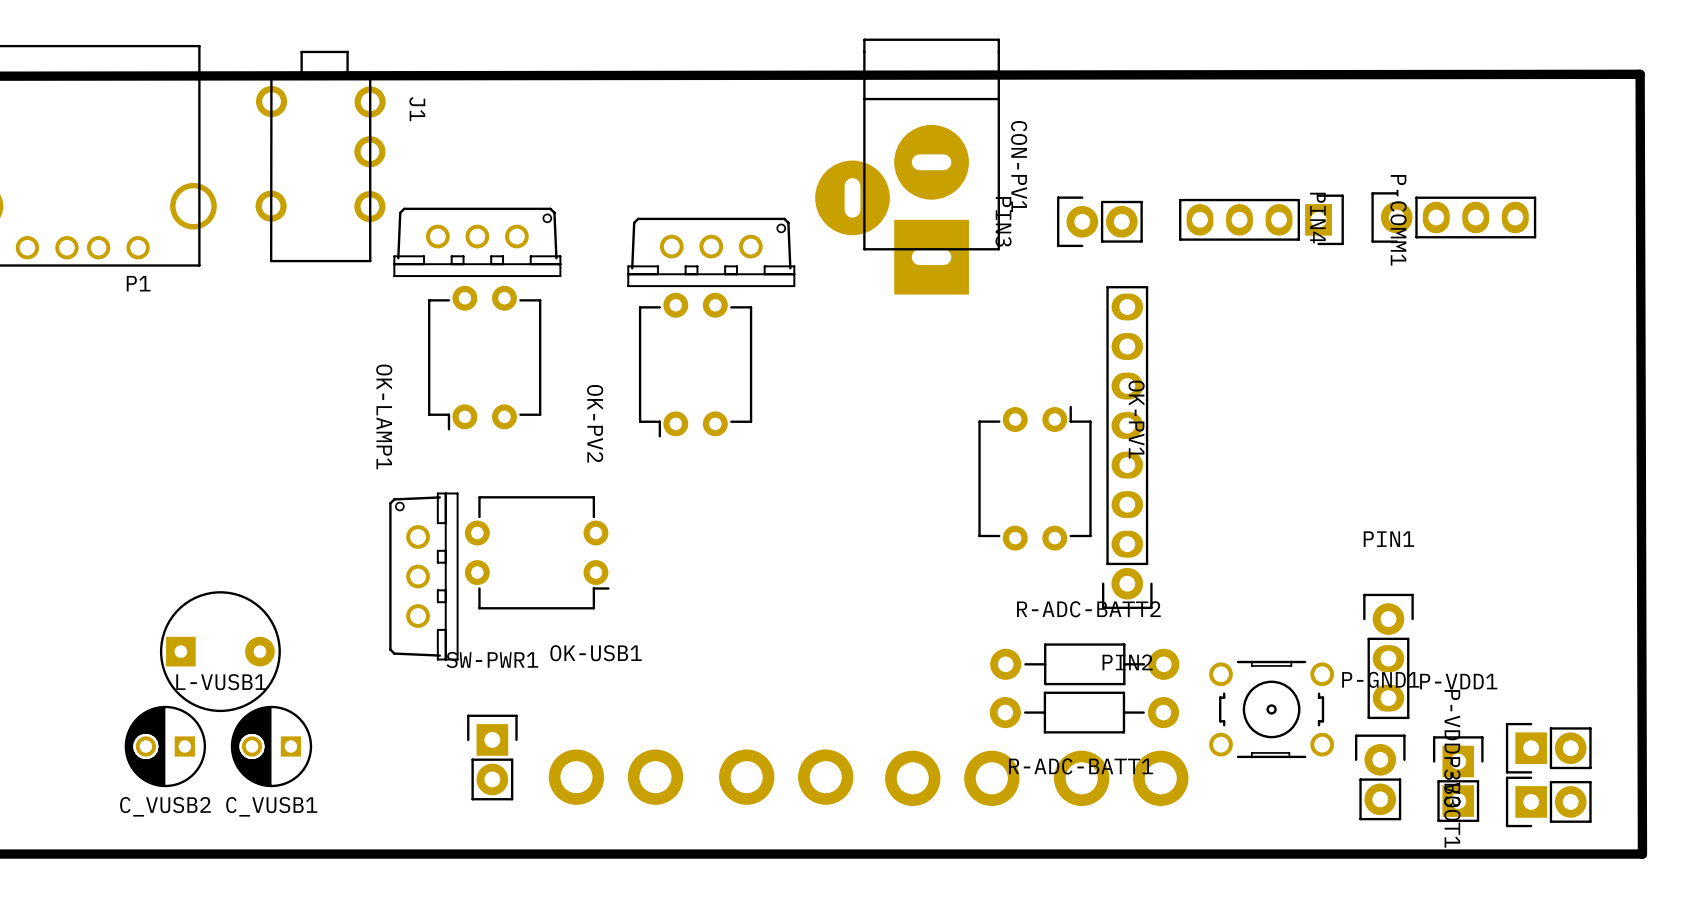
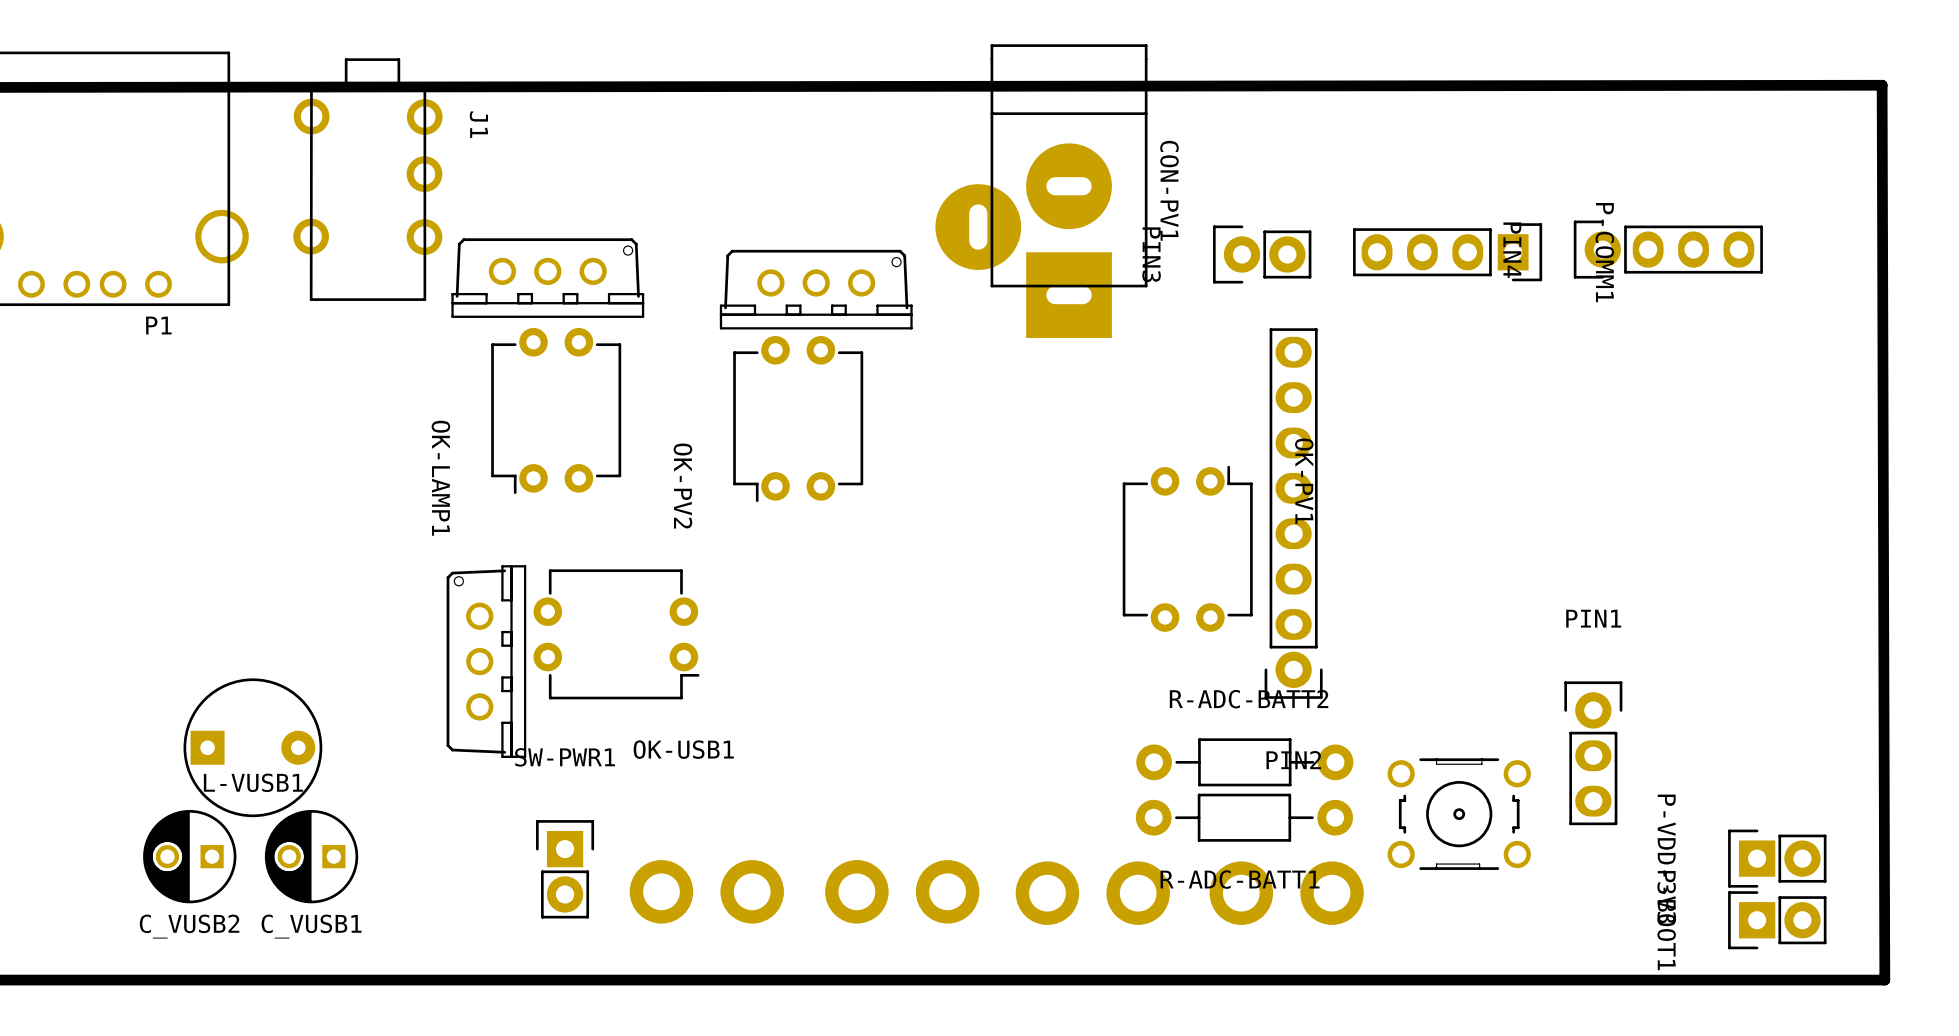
P-GND1: (1380, 777) -> none
P-VDD1: (1458, 779) -> none

